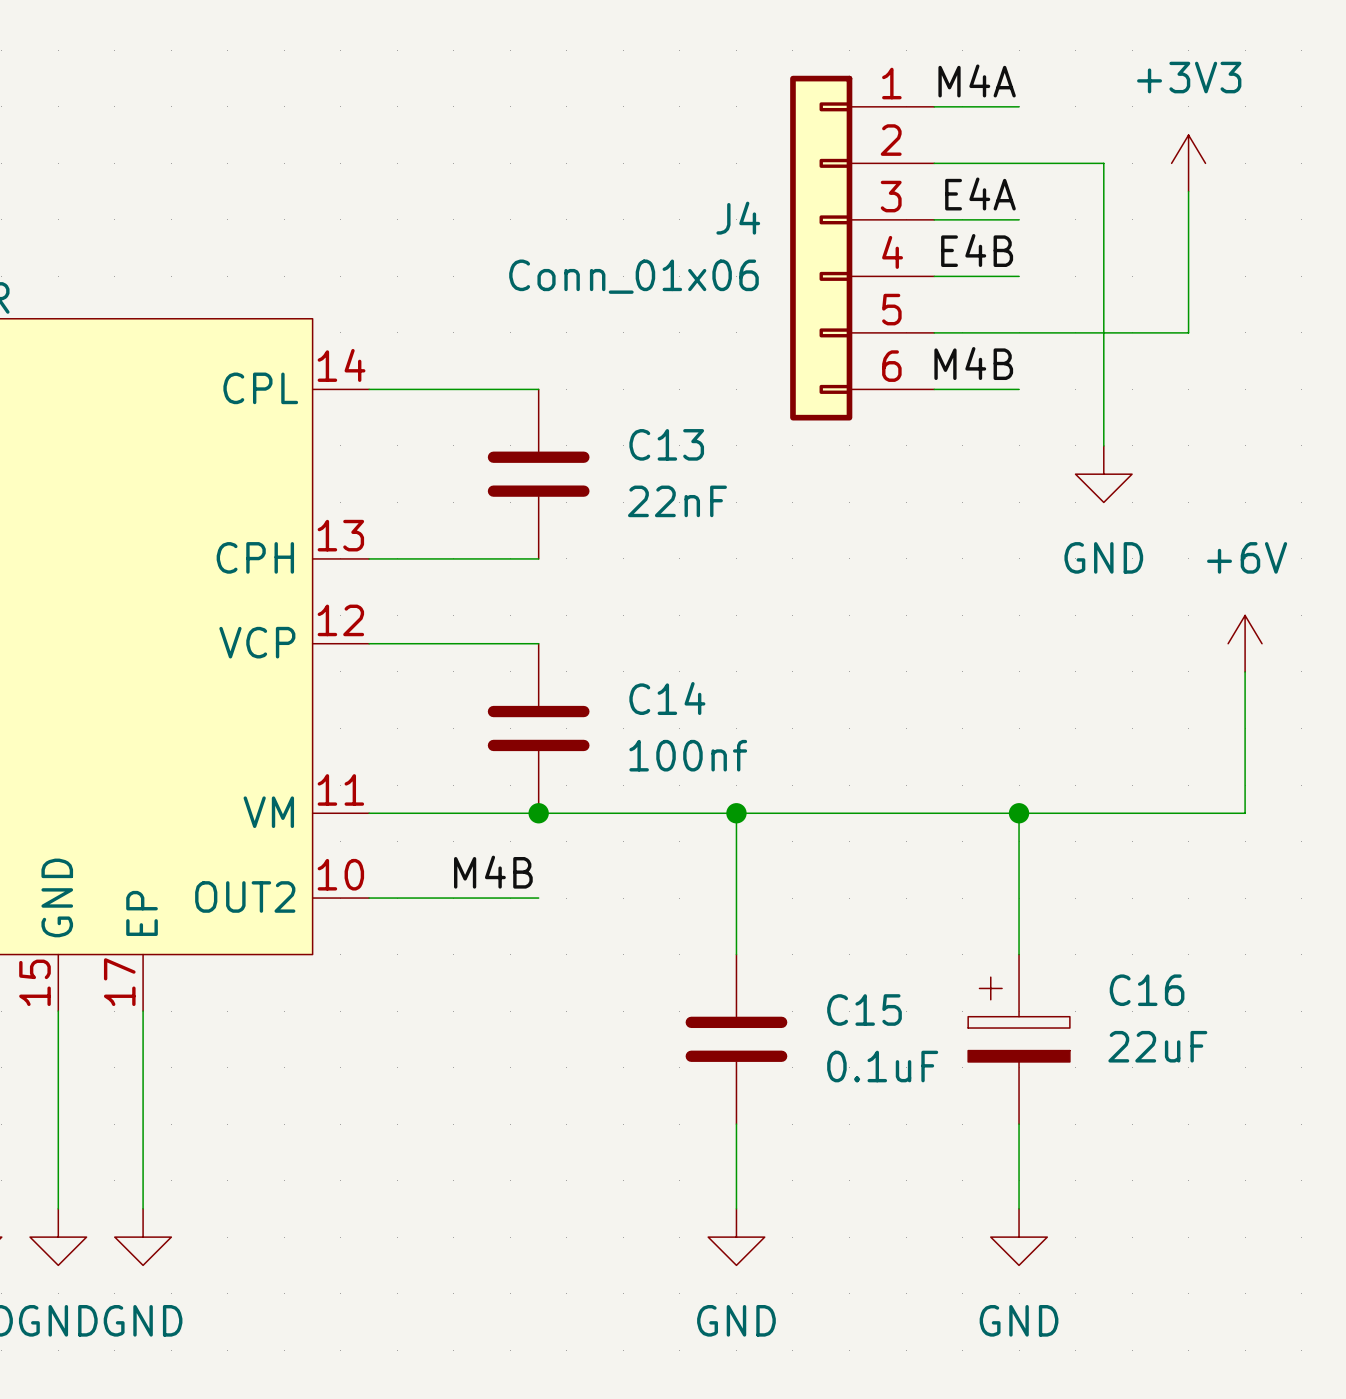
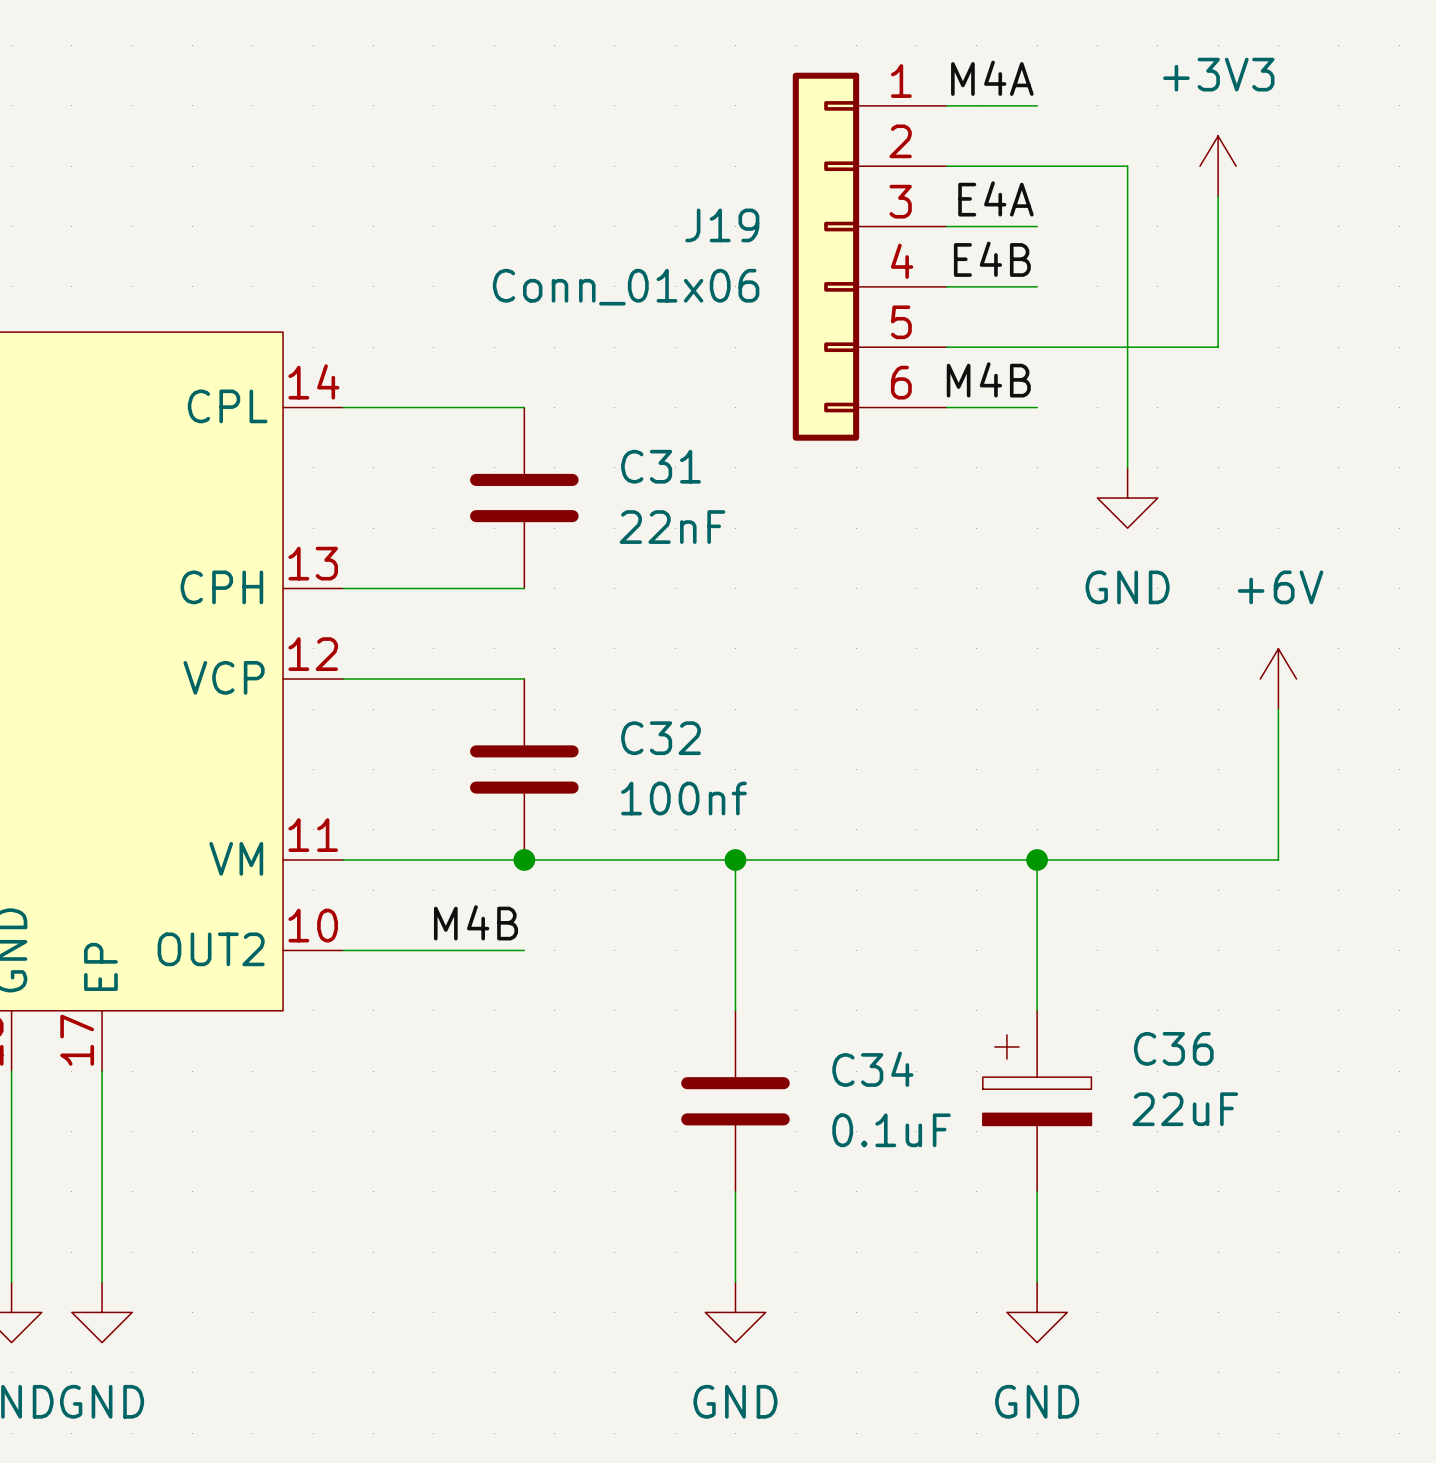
J4 name: J4 (738, 218) -> J19 (722, 225)
C13 name: C13 (666, 444) -> C31 (661, 466)
C14 name: C14 (667, 698) -> C32 (661, 738)
C16 name: C16 (1147, 990) -> C36 (1173, 1048)
C15 name: C15 (864, 1010) -> C34 (872, 1069)

